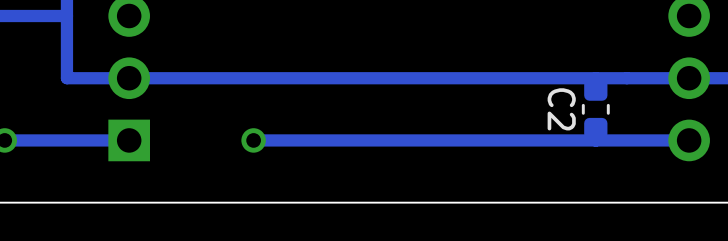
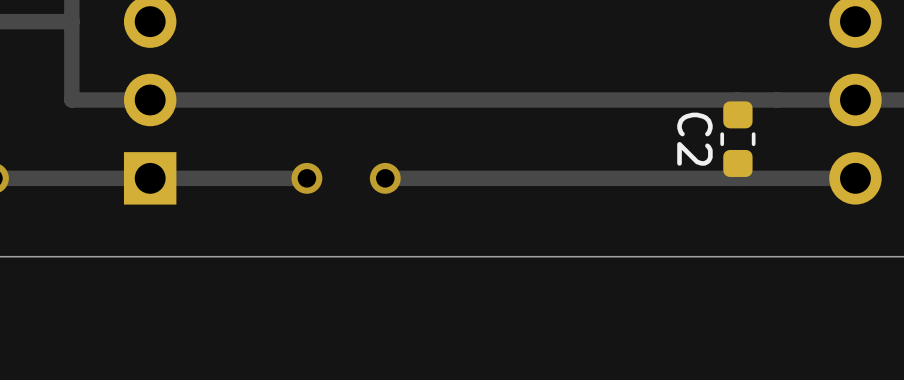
track: (315, 140) (253, 140) -> (150, 178) (306, 178)
via: none -> (385, 178)

